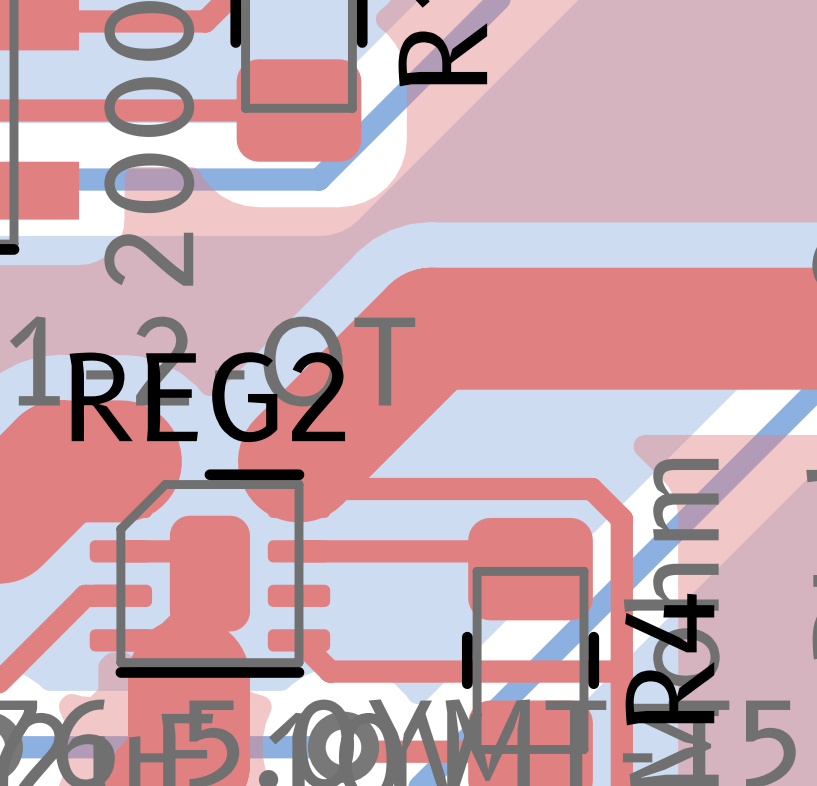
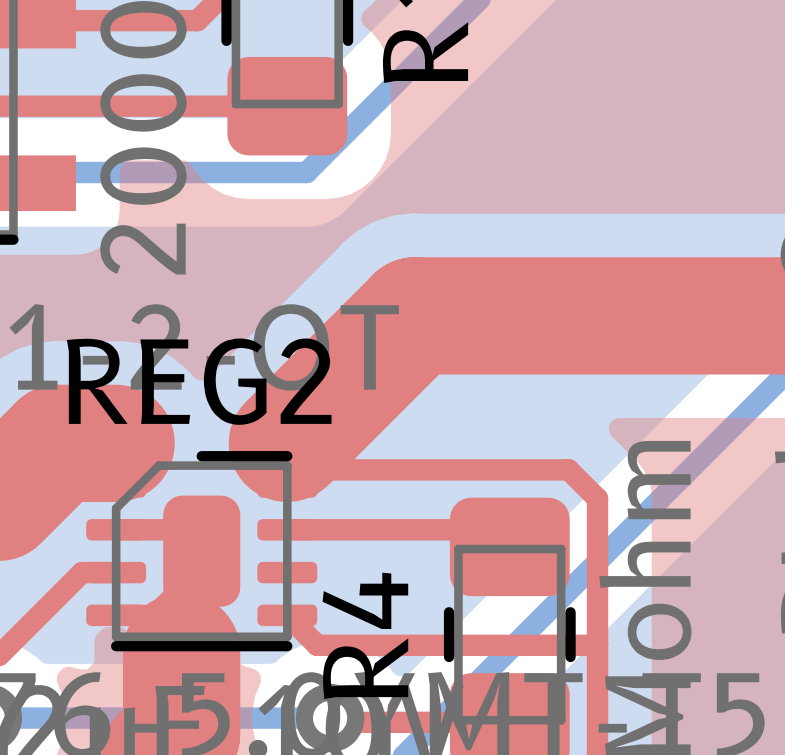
R4 name position: R4 (669, 659) -> R4 (365, 635)

